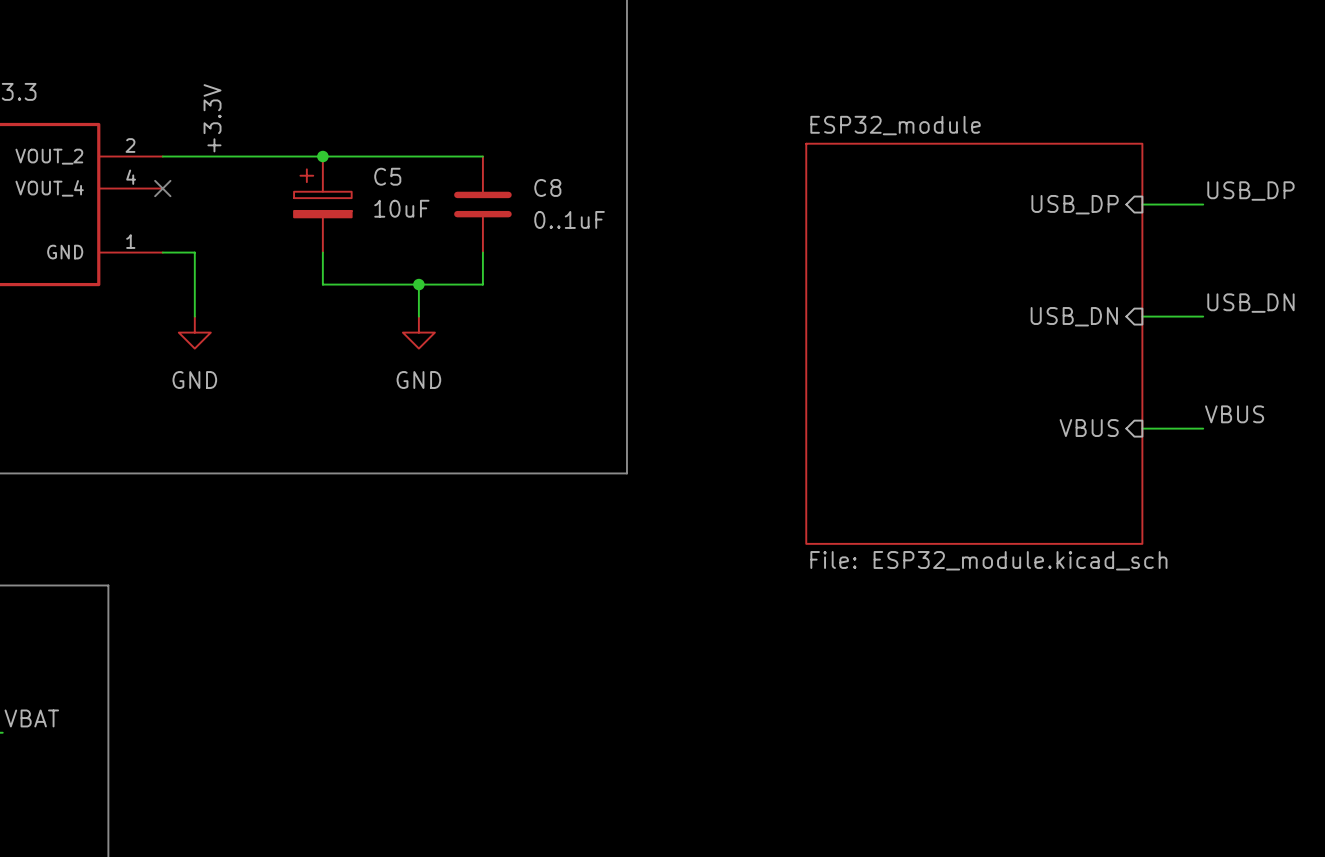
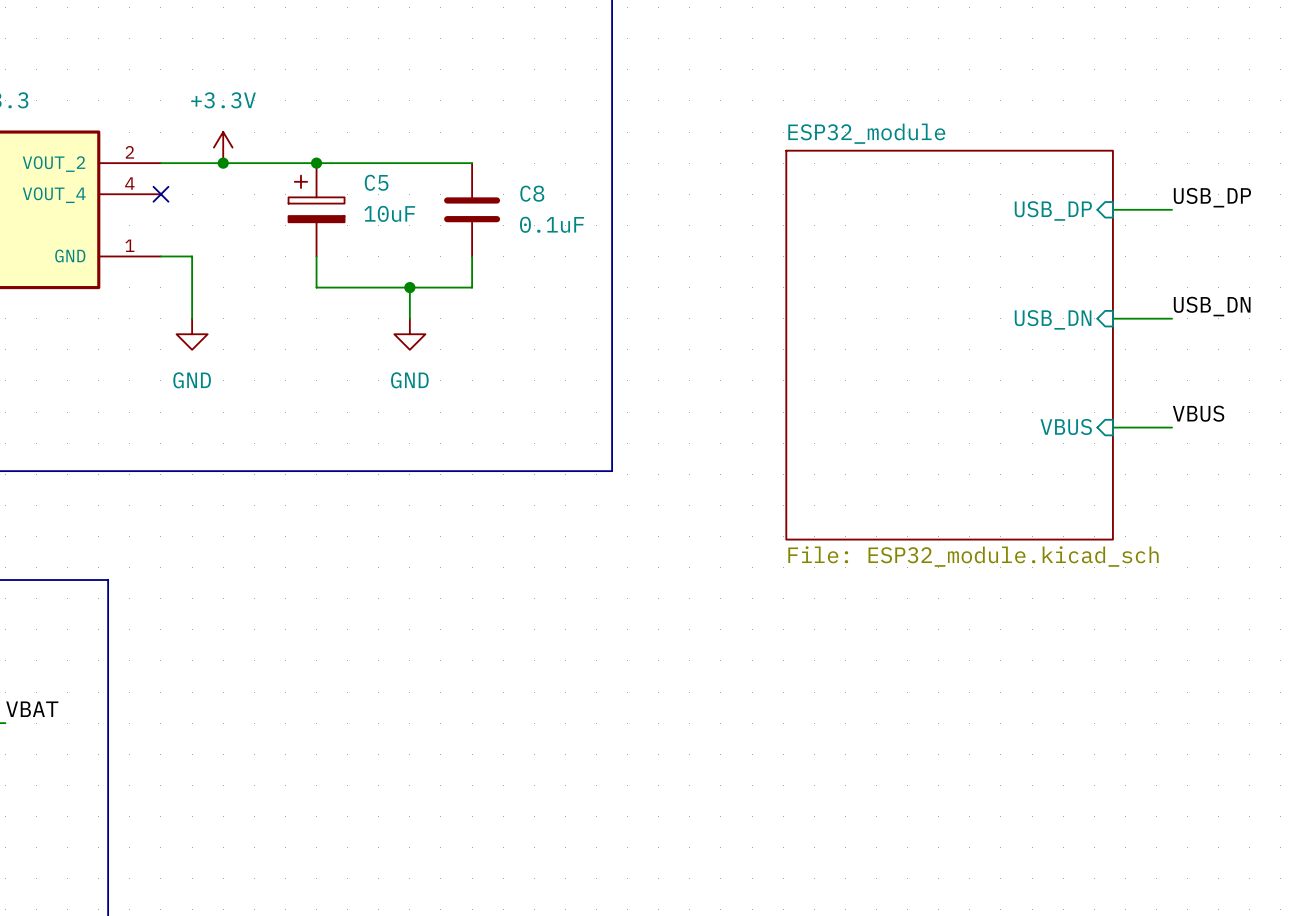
label: +3.3V (212, 118) -> none
power symbol: none -> +3.3V (223, 147)
junction: none -> (223, 163)
C8 value: 0..1uF (569, 219) -> 0.1uF (552, 224)

